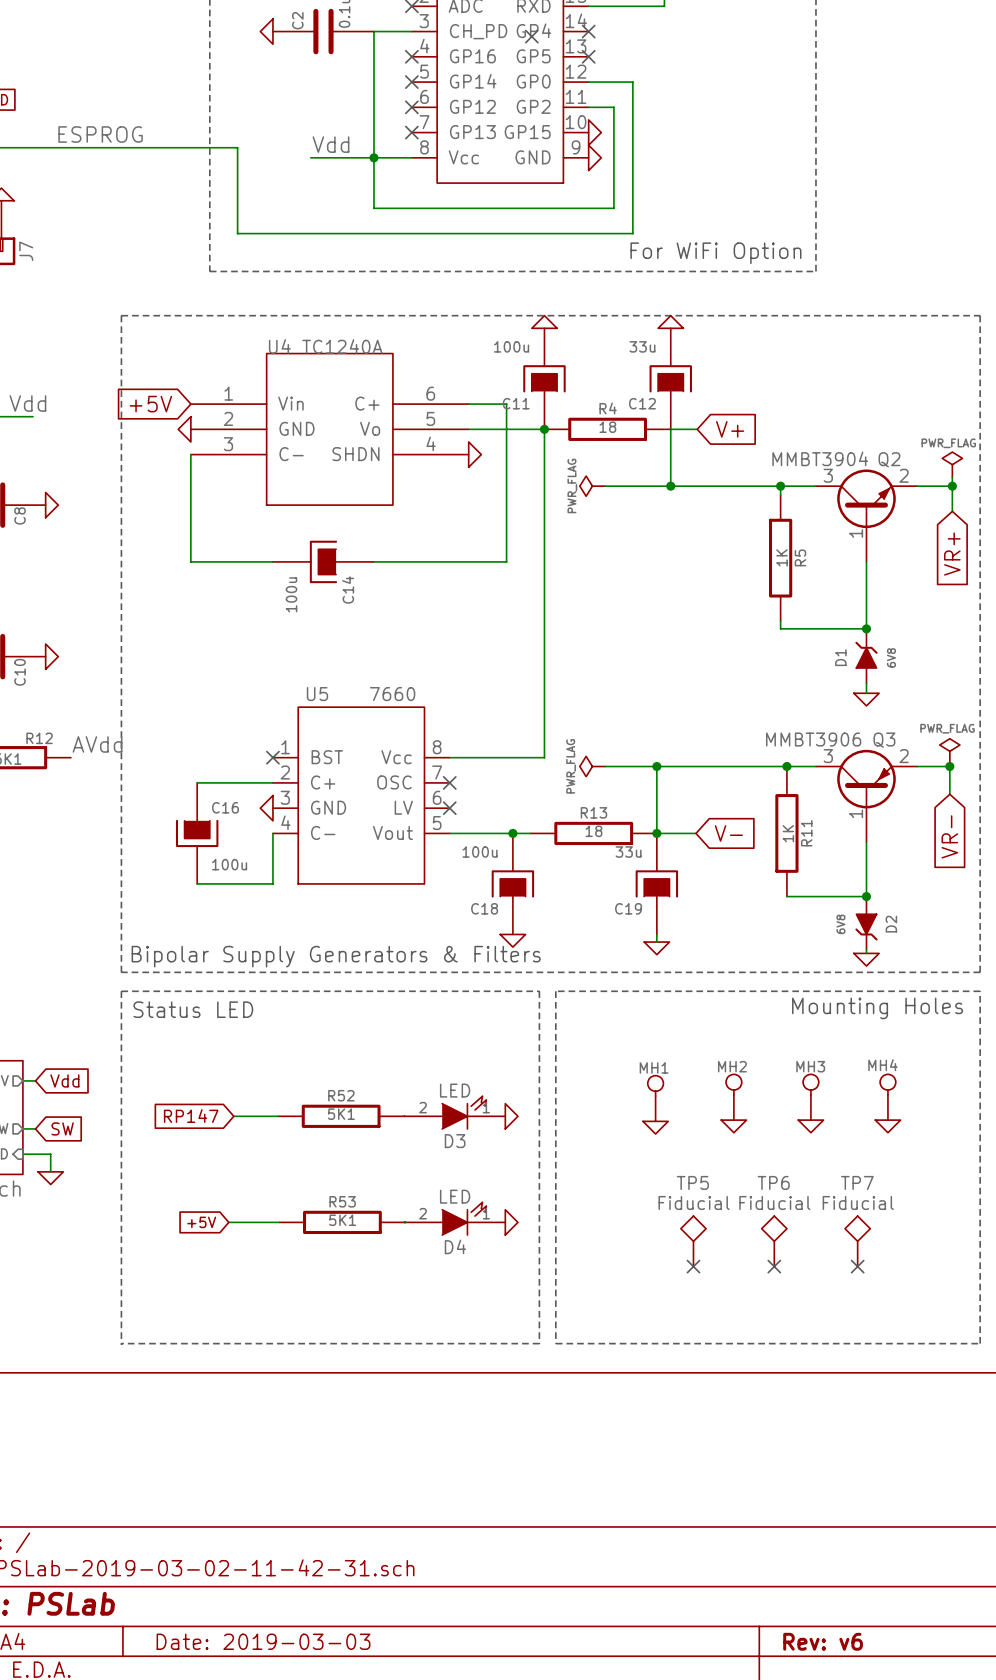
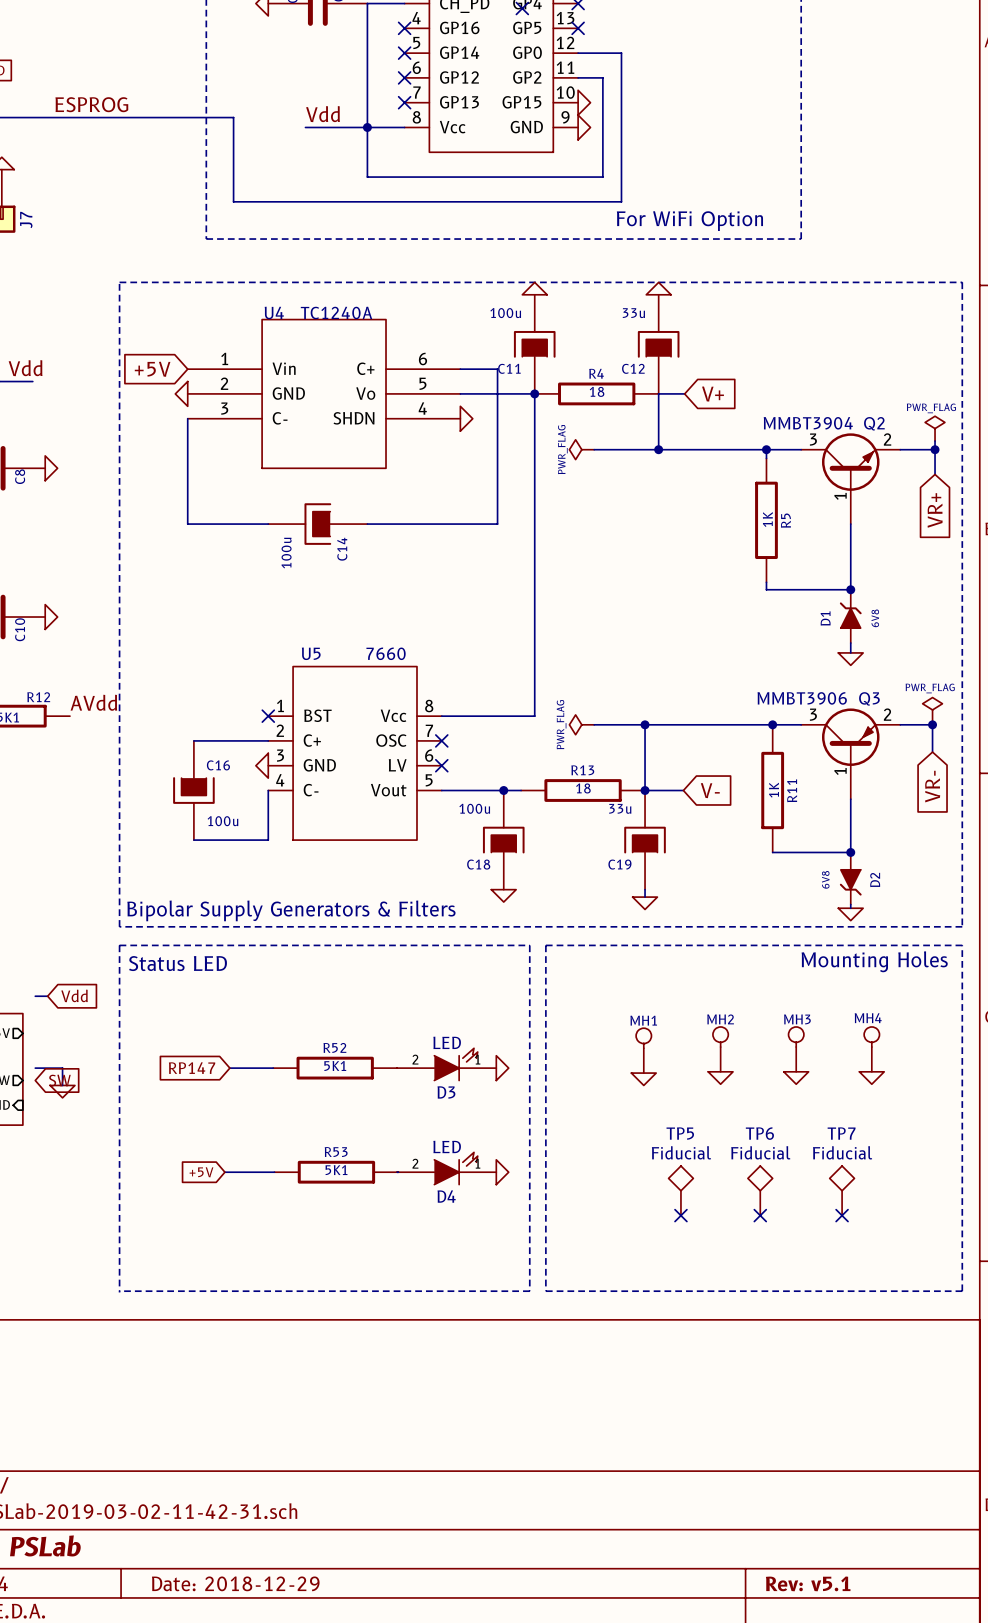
wire: (22, 1080) (35, 1080) -> (35, 996) (47, 996)
global label position: Vdd (64, 1080) -> Vdd (74, 995)
wire: (22, 1128) (35, 1128) -> none
power symbol: none -> (62, 1091)
wire: (22, 1154) (50, 1154) (50, 1171) -> (35, 1068) (62, 1068) (62, 1085)
power symbol: (50, 1178) -> none
title block: Date: 2019-03-03 (263, 1641) -> Date: 2018-12-29 (235, 1583)
title block: Rev: v6 (823, 1641) -> Rev: v5.1 (808, 1583)

